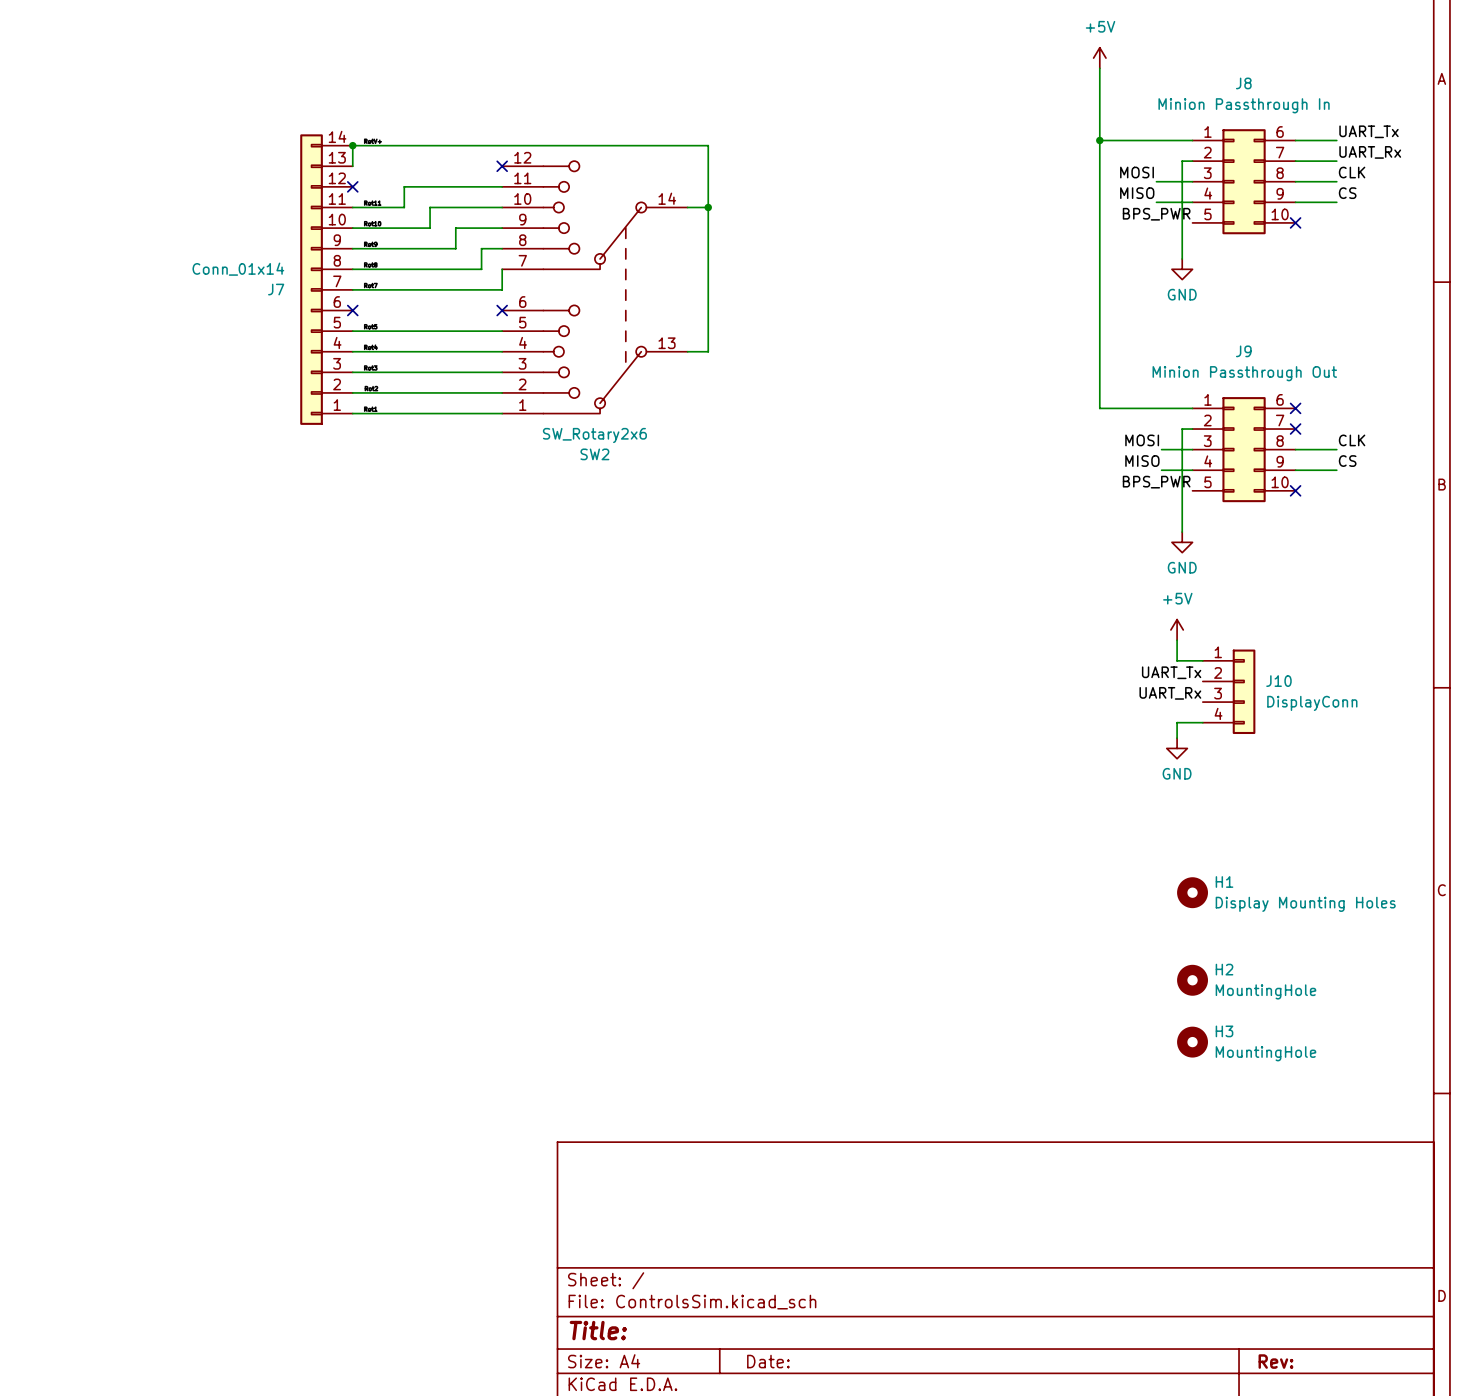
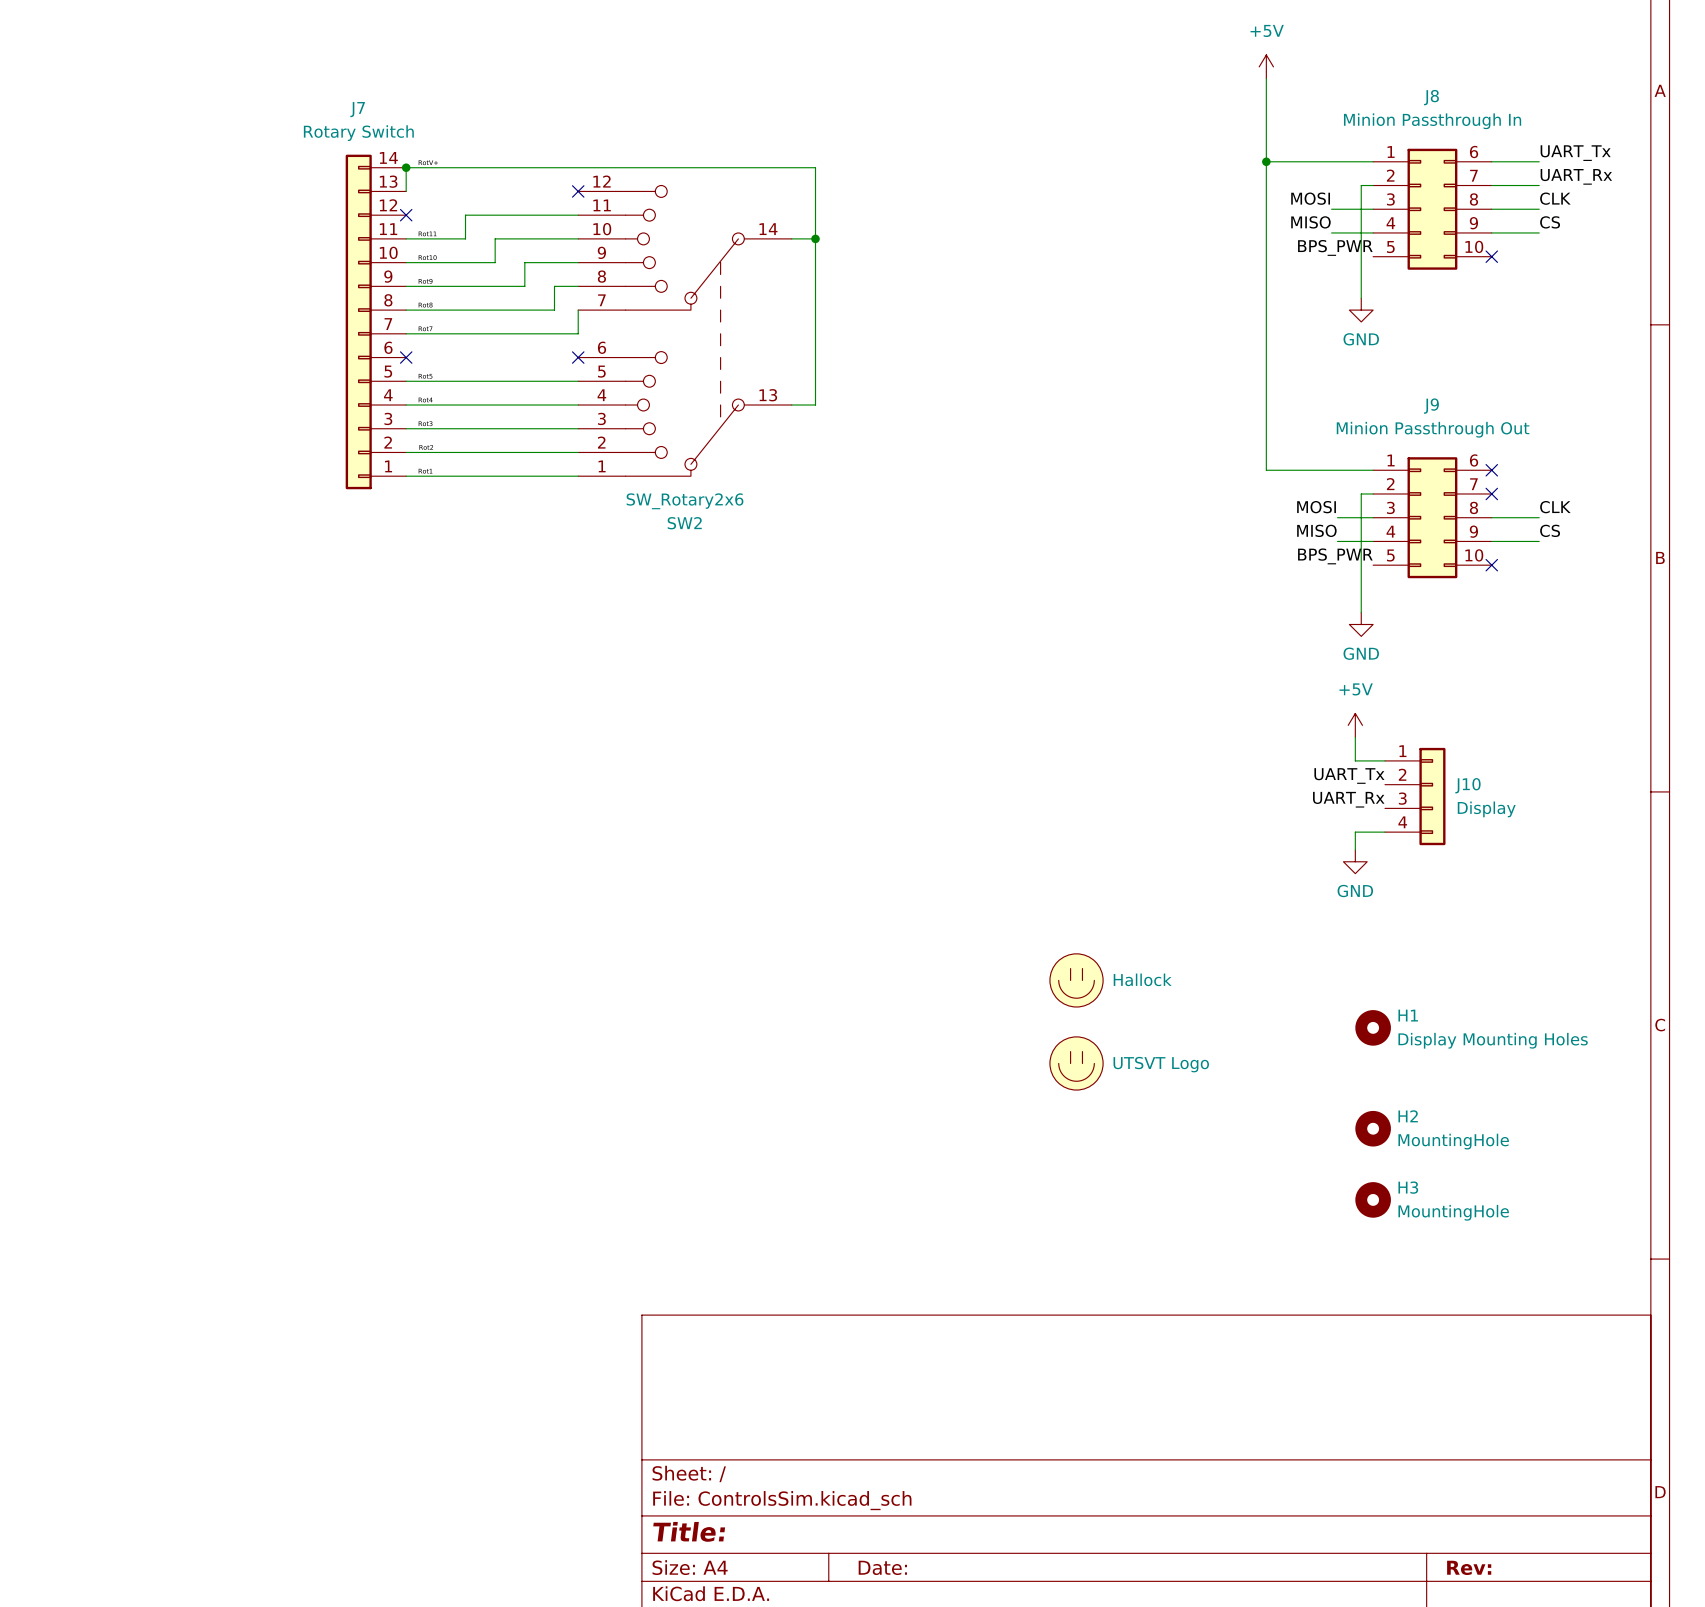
J7 value: Conn_01x14 (238, 269) -> Rotary Switch (358, 133)
J7 name position: J7 (276, 289) -> J7 (357, 109)
J10 value: DisplayConn (1312, 703) -> Display (1486, 809)
part: none -> Hallock (1076, 980)
part: none -> UTSVT Logo (1076, 1063)

